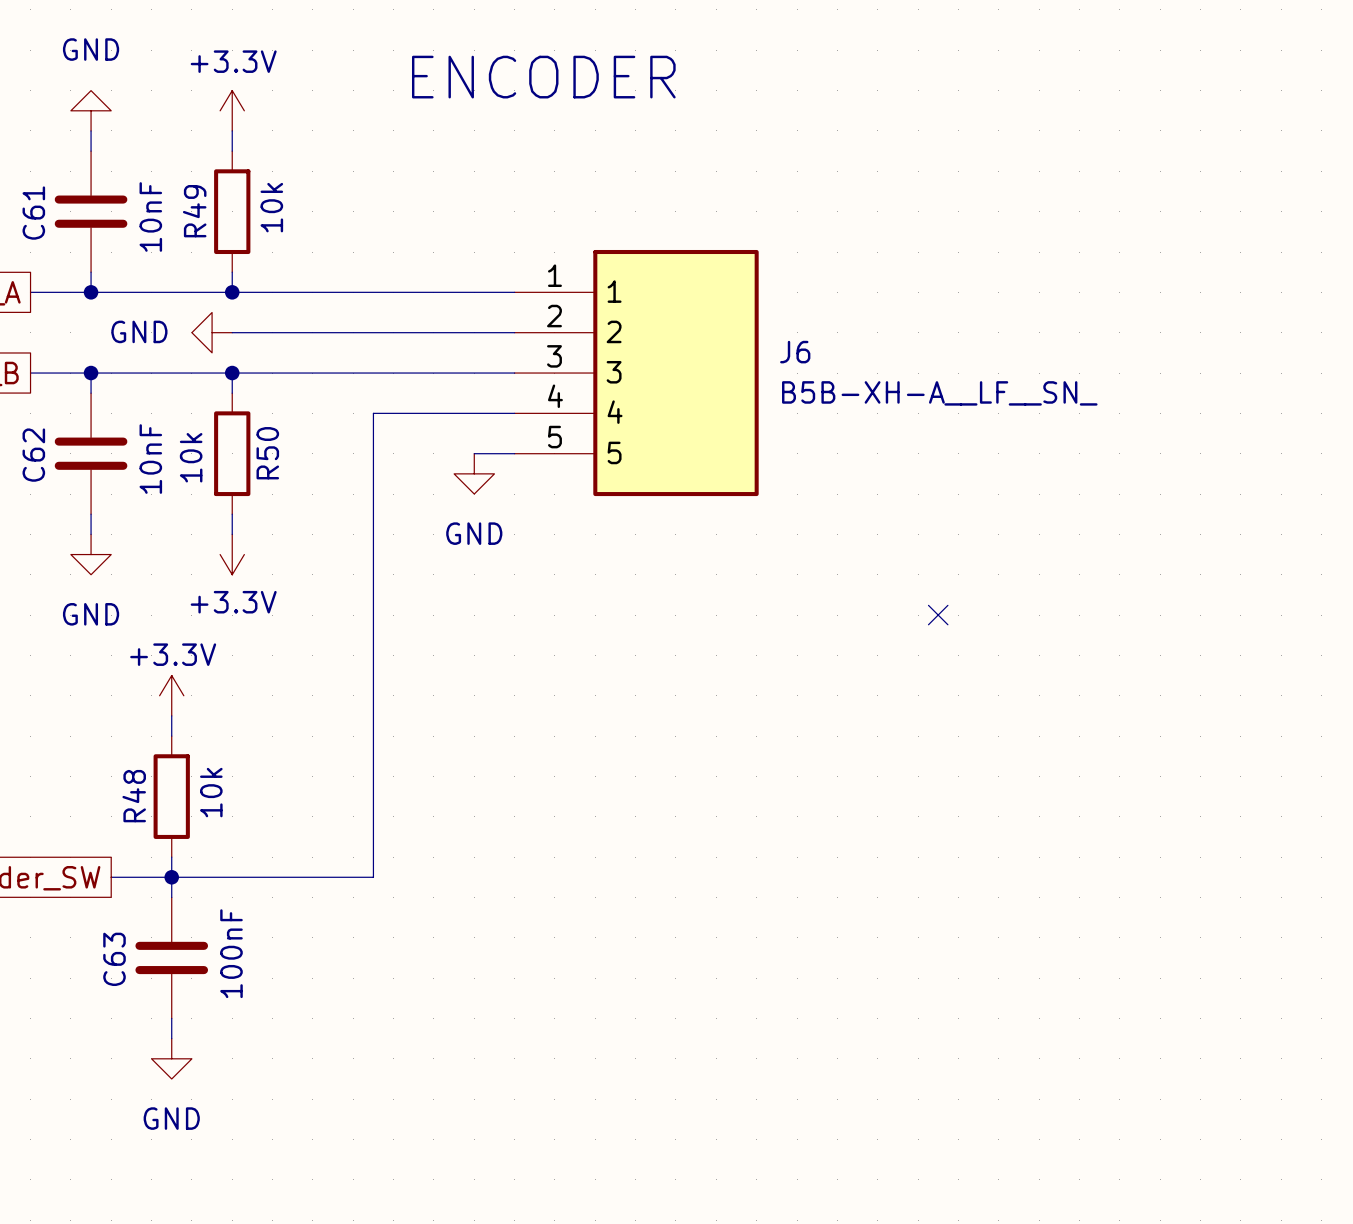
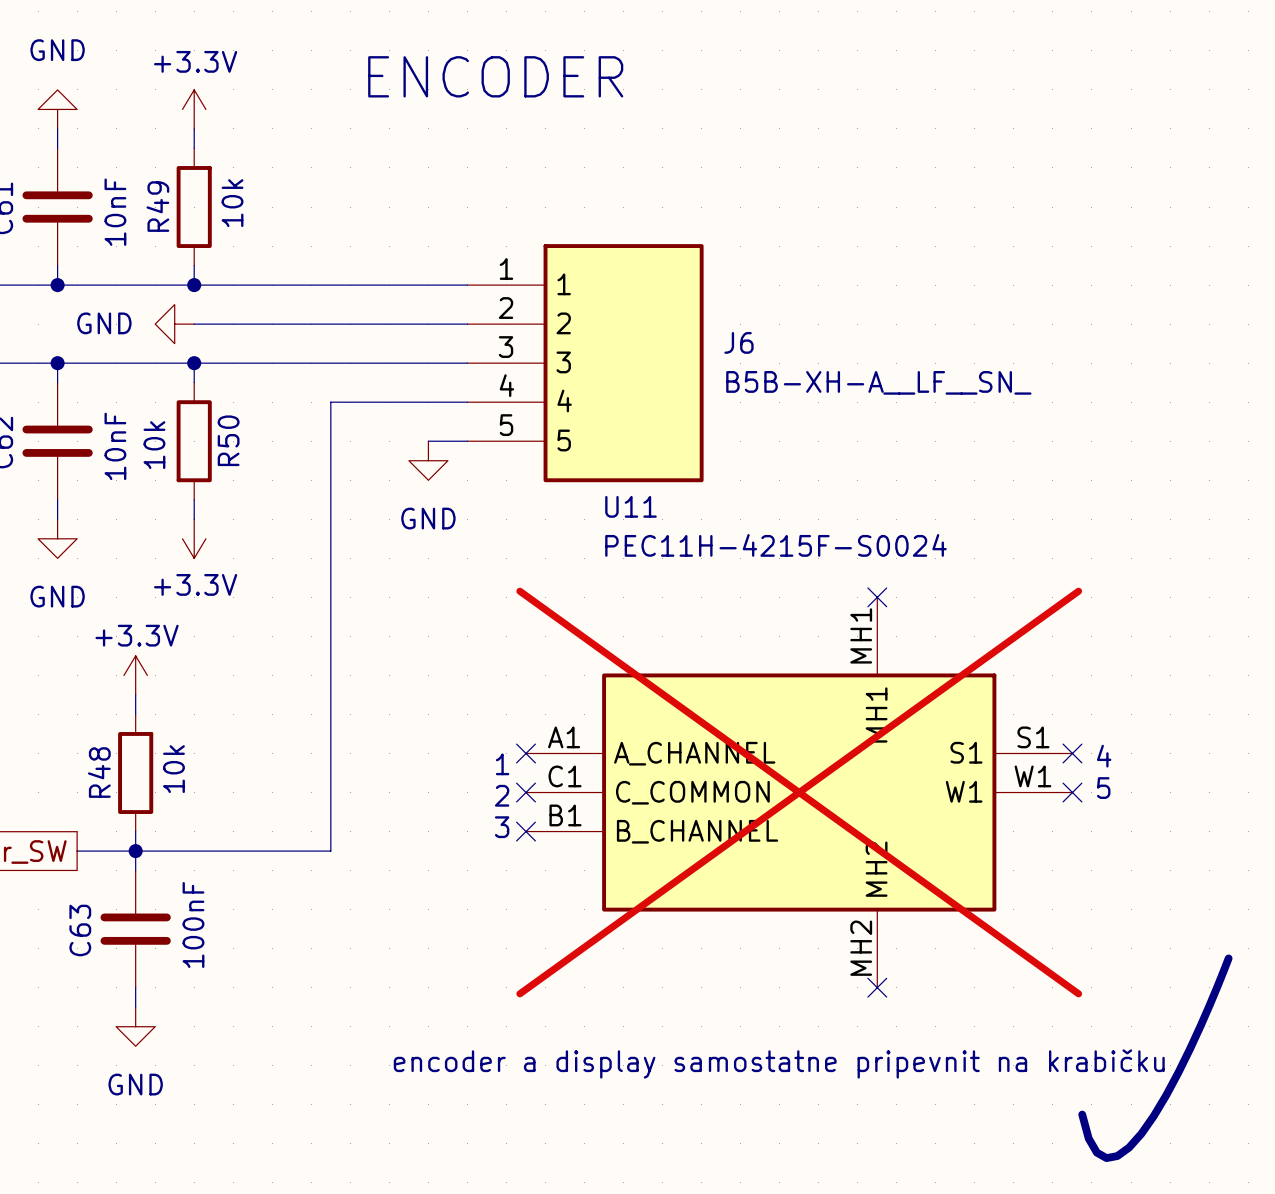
no-connect mark: none -> (526, 753)
no-connect mark: none -> (1072, 753)
text: none -> 4 (1104, 756)
text: none -> 1 (502, 764)
text: none -> 5 (1103, 788)
no-connect mark: none -> (526, 792)
U11: none -> PEC11H-4215F-S0024 (799, 792)
no-connect mark: none -> (1072, 792)
text: none -> 2 (502, 795)
text: none -> 3 (502, 827)
no-connect mark: none -> (526, 831)
line: none -> (1228, 958) (1200, 1026) (1178, 1072) (1153, 1115) (1129, 1147) (1117, 1156) (1106, 1158) (1096, 1152) (1088, 1138) (1082, 1114)
no-connect mark: none -> (877, 987)
text: none -> encoder a display samostatne pripevnit na krabičku (779, 1063)

